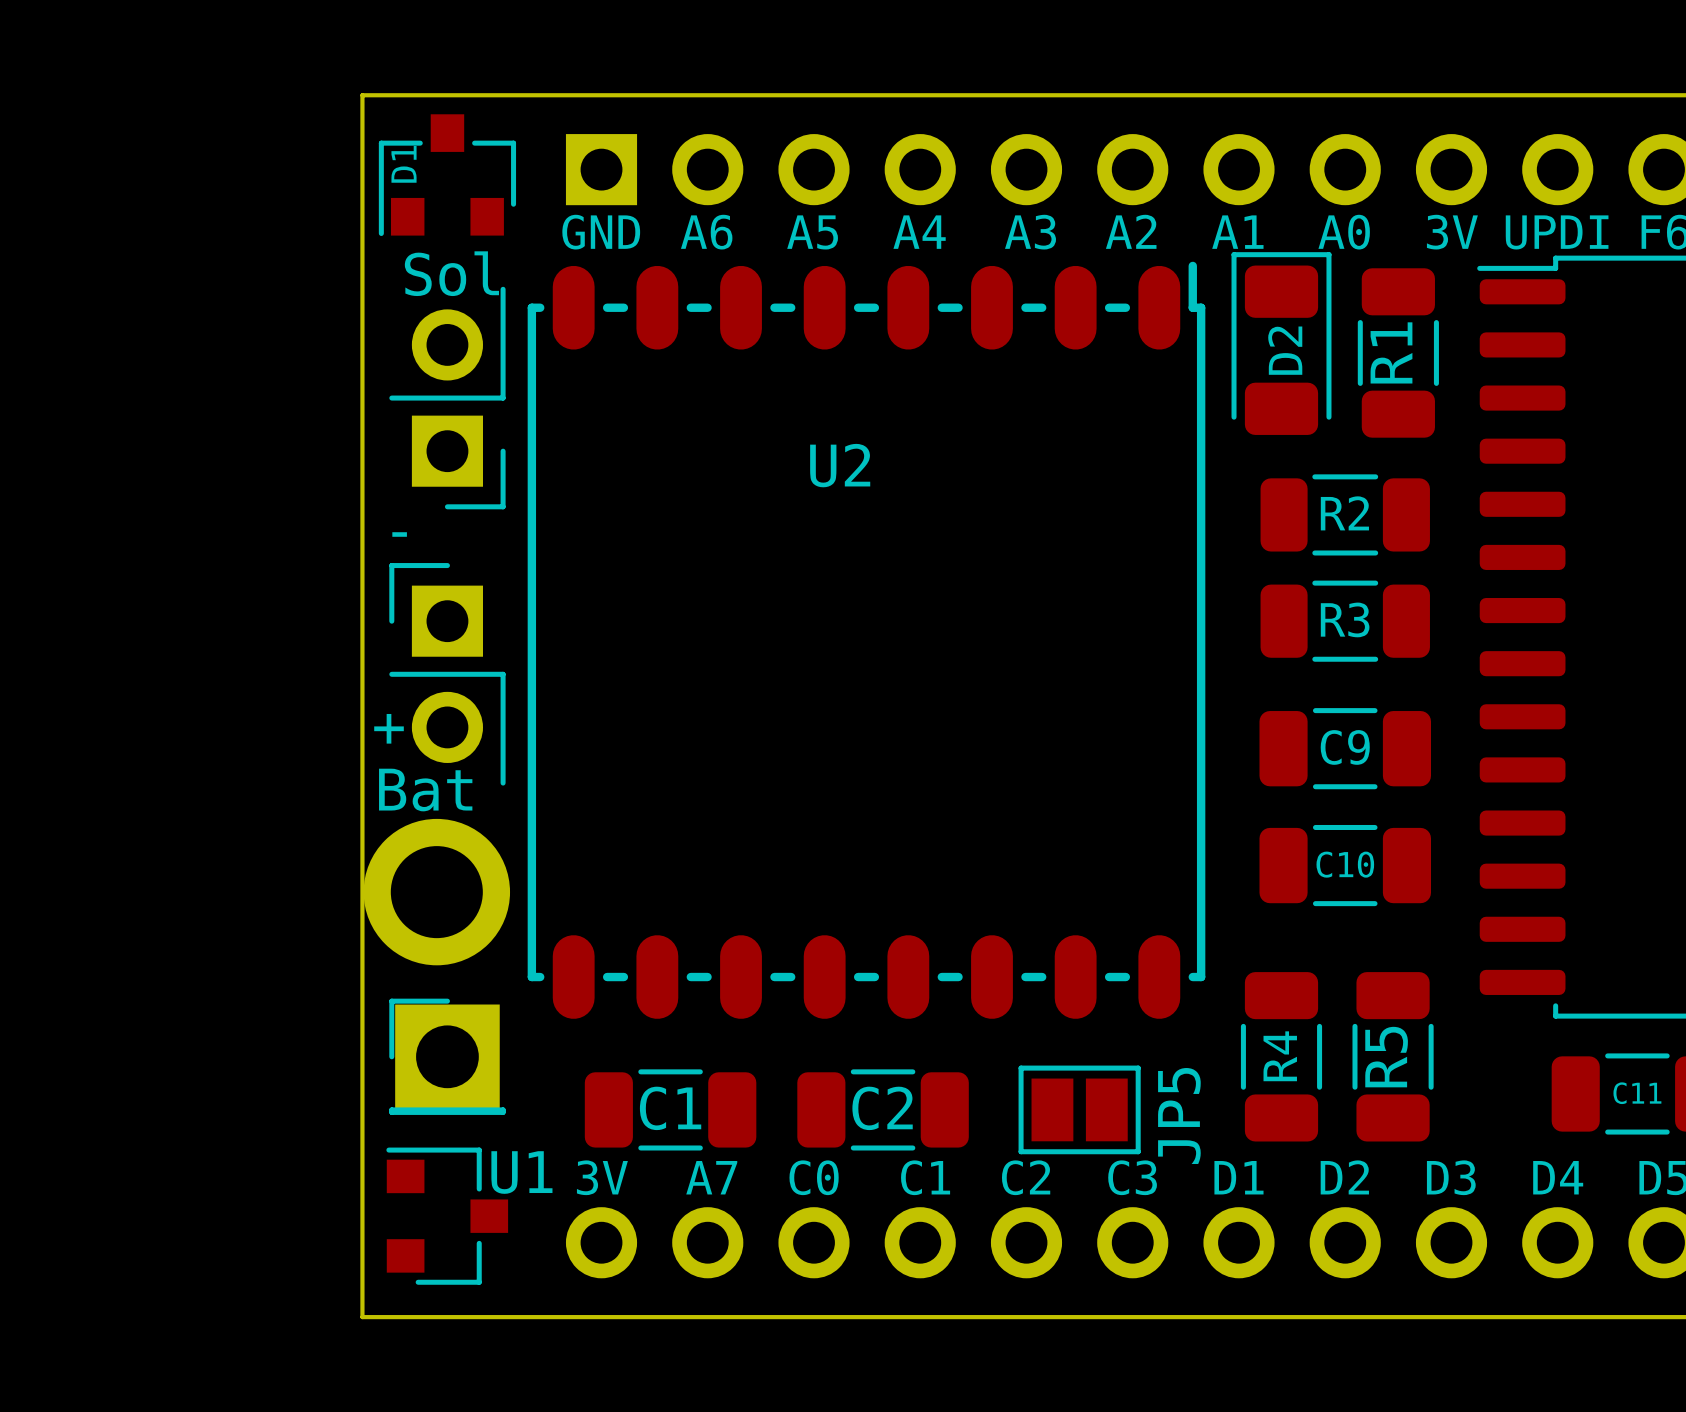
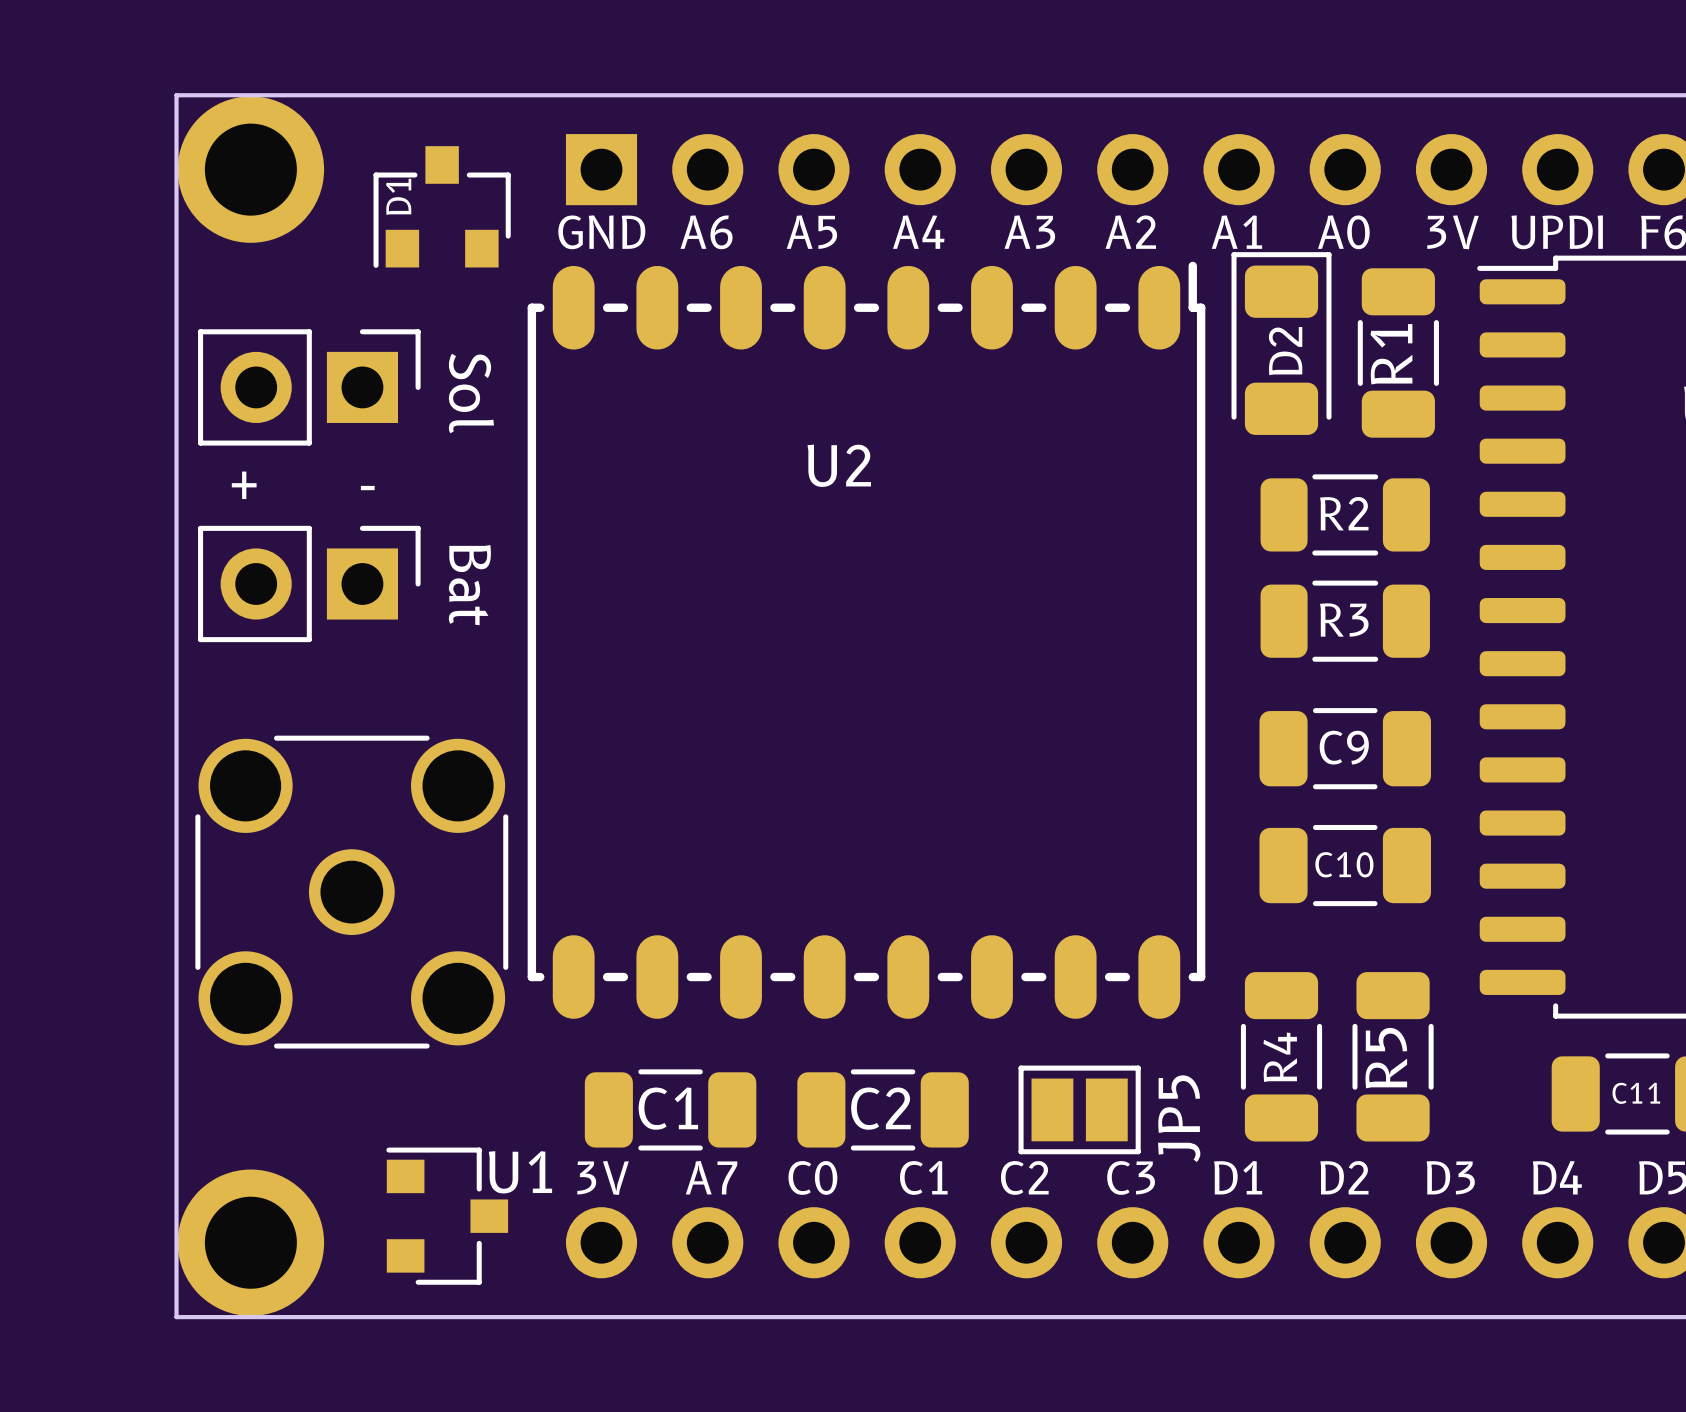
board edge: (362, 95) (362, 1317) -> (362, 95) (176, 95) (176, 1317) (362, 1317)
part: none -> (250, 169)
D1 position: (447, 175) -> (442, 207)
text rotation: 0° (451, 273) -> 90° clockwise (471, 393)
part: none -> (309, 387)
part: (447, 398) -> none
text position: - (399, 534) -> - (367, 488)
part: none -> (309, 583)
part: (447, 674) -> none
text position: + (389, 728) -> + (244, 485)
text rotation: 0° (425, 790) -> 90° clockwise (469, 585)
text position: Bat (425, 790) -> Bat (469, 585)
part: none -> (351, 892)
part: (436, 892) -> none
part: (447, 1056) -> none
part: none -> (250, 1242)

